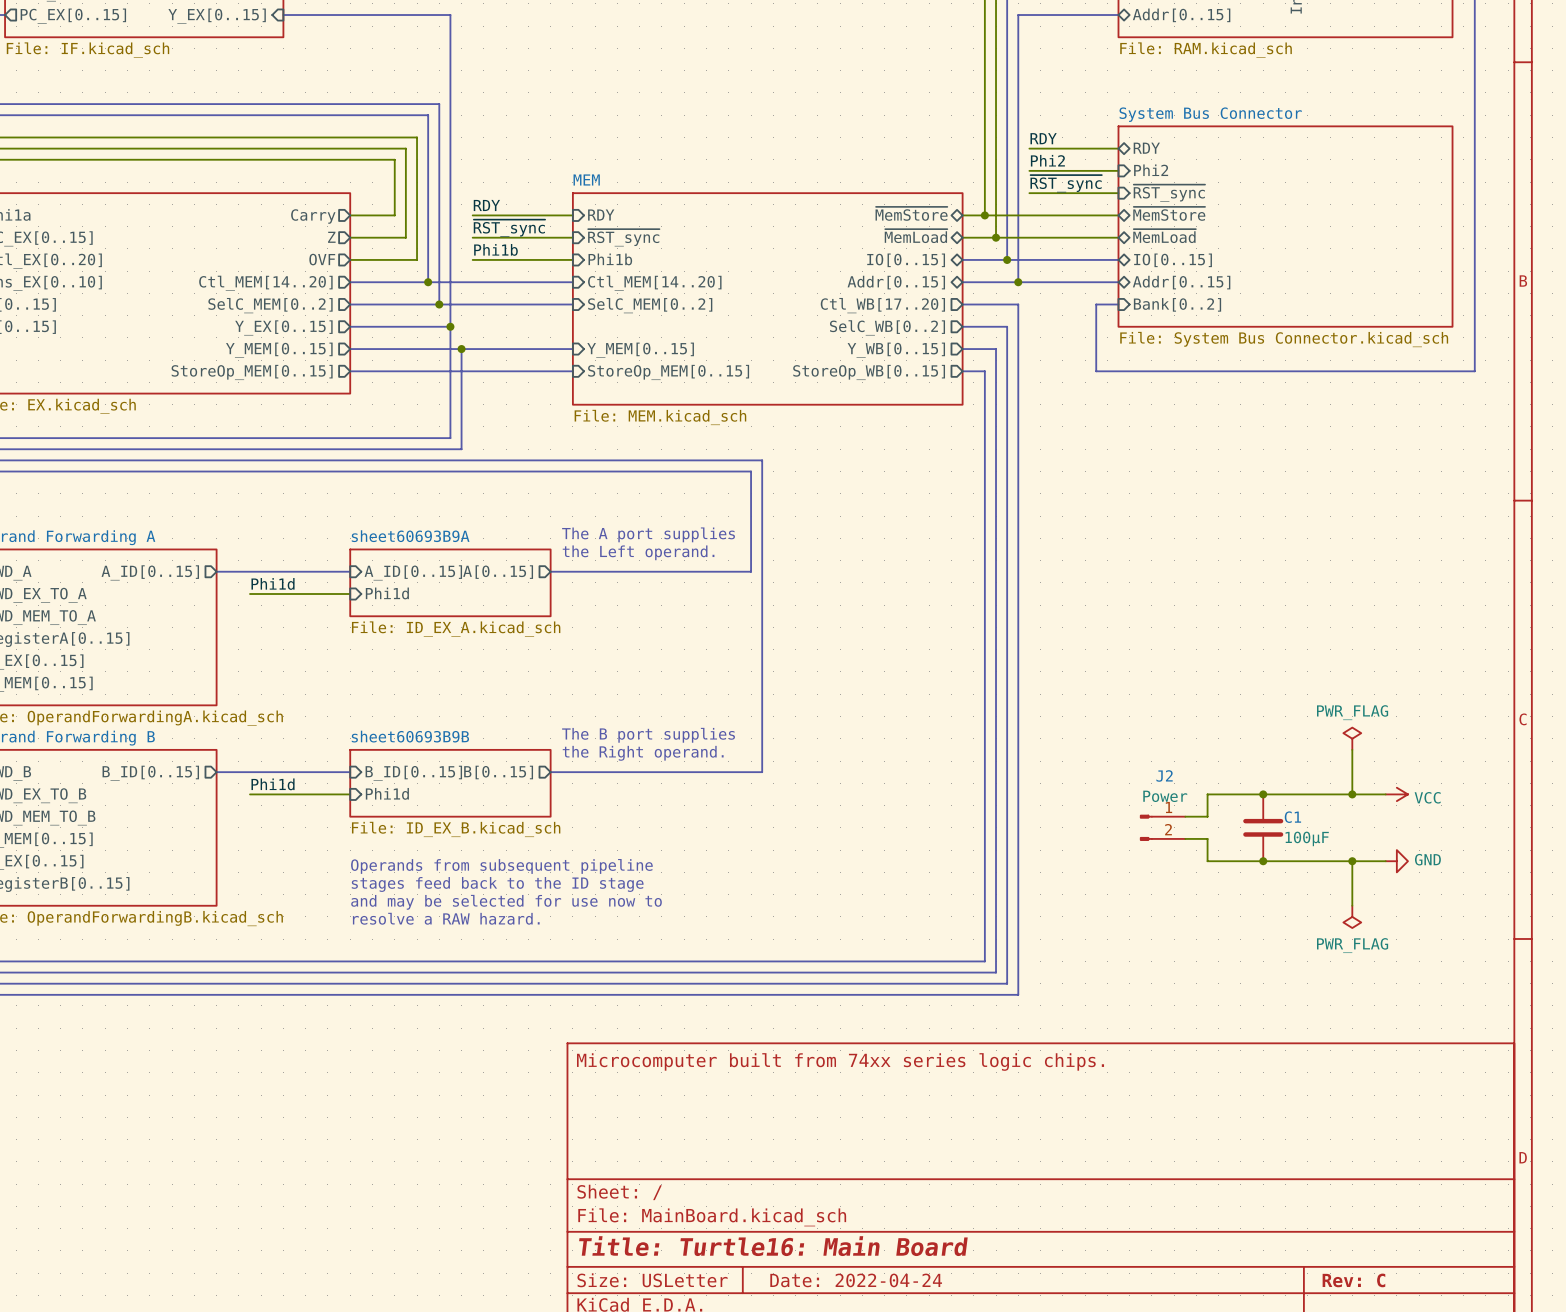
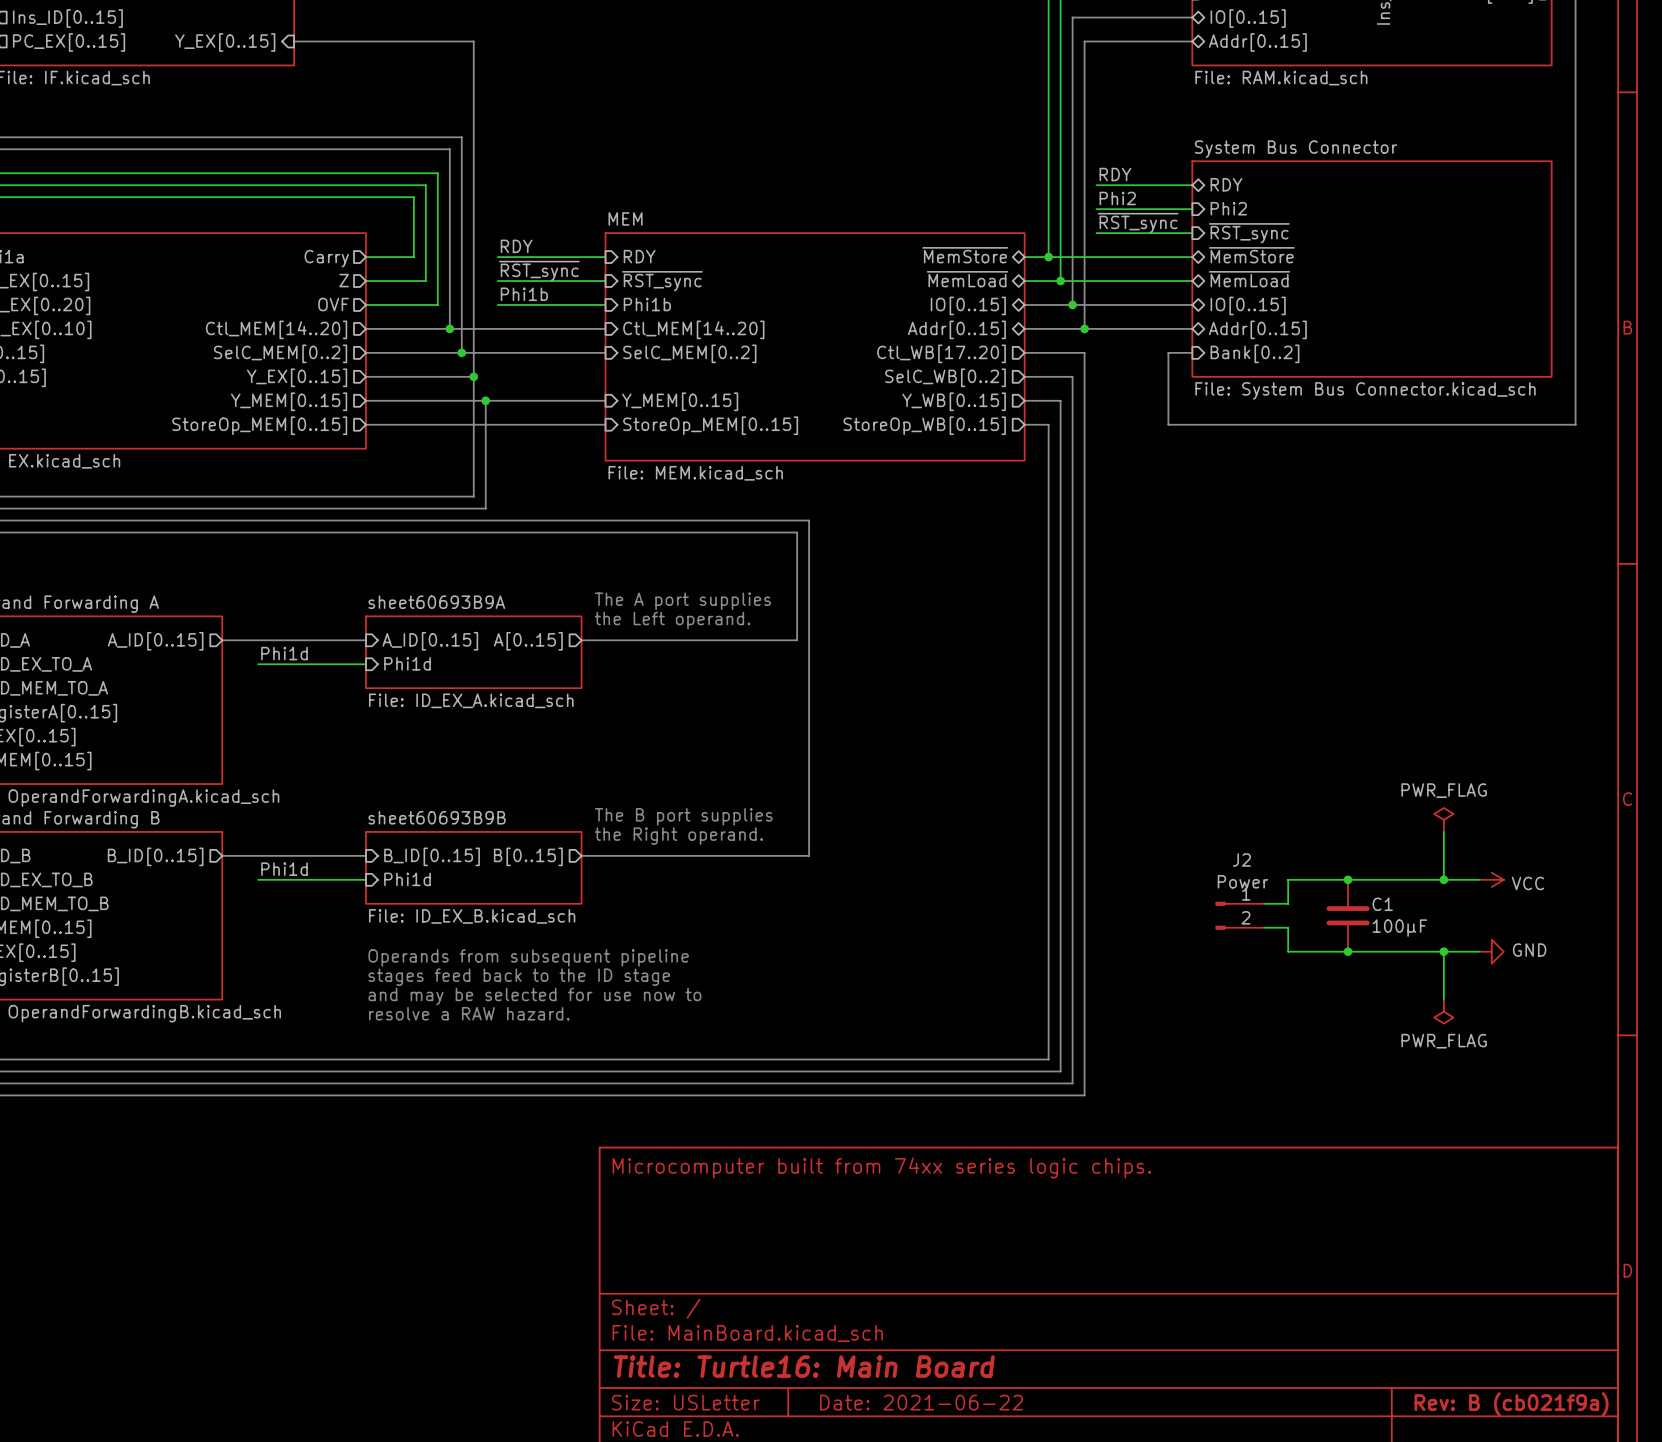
title block: Date: 2022-04-24 (856, 1280) -> Date: 2021-06-22 (921, 1402)
title block: Rev: C (1353, 1280) -> Rev: B (cb021f9a) (1511, 1404)

